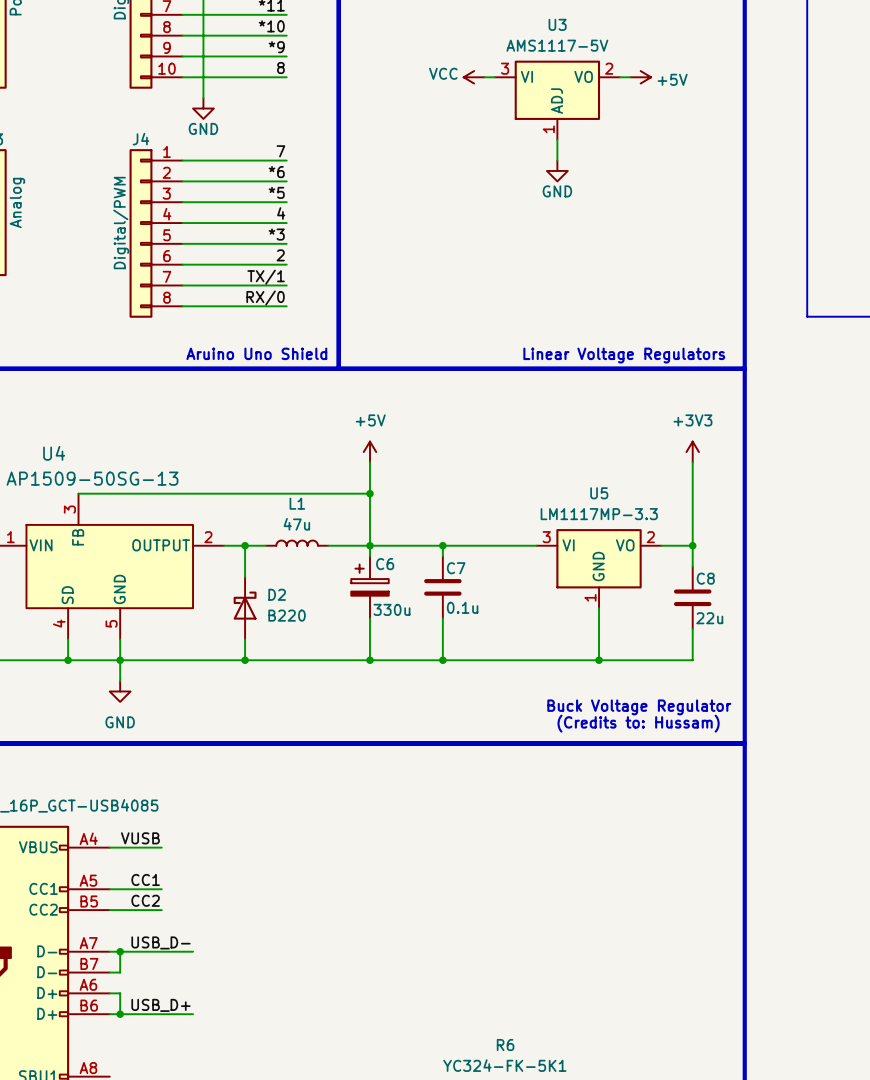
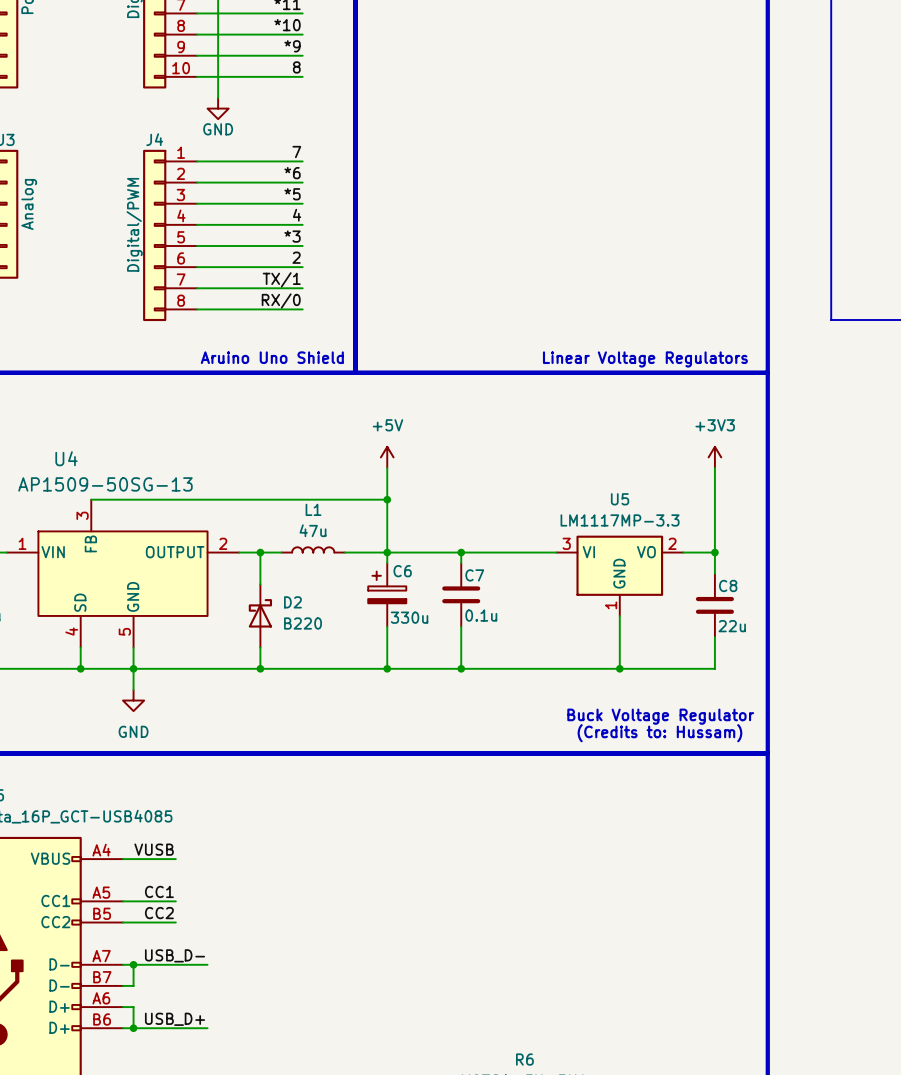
power symbol: VCC (474, 77) -> none
wire: (484, 77) (494, 77) -> none
wire: (619, 77) (630, 77) -> none
power symbol: +5V (640, 77) -> none
U3: AMS1117-5V (557, 100) -> none
wire: (557, 139) (557, 160) -> none
power symbol: GND (557, 170) -> none

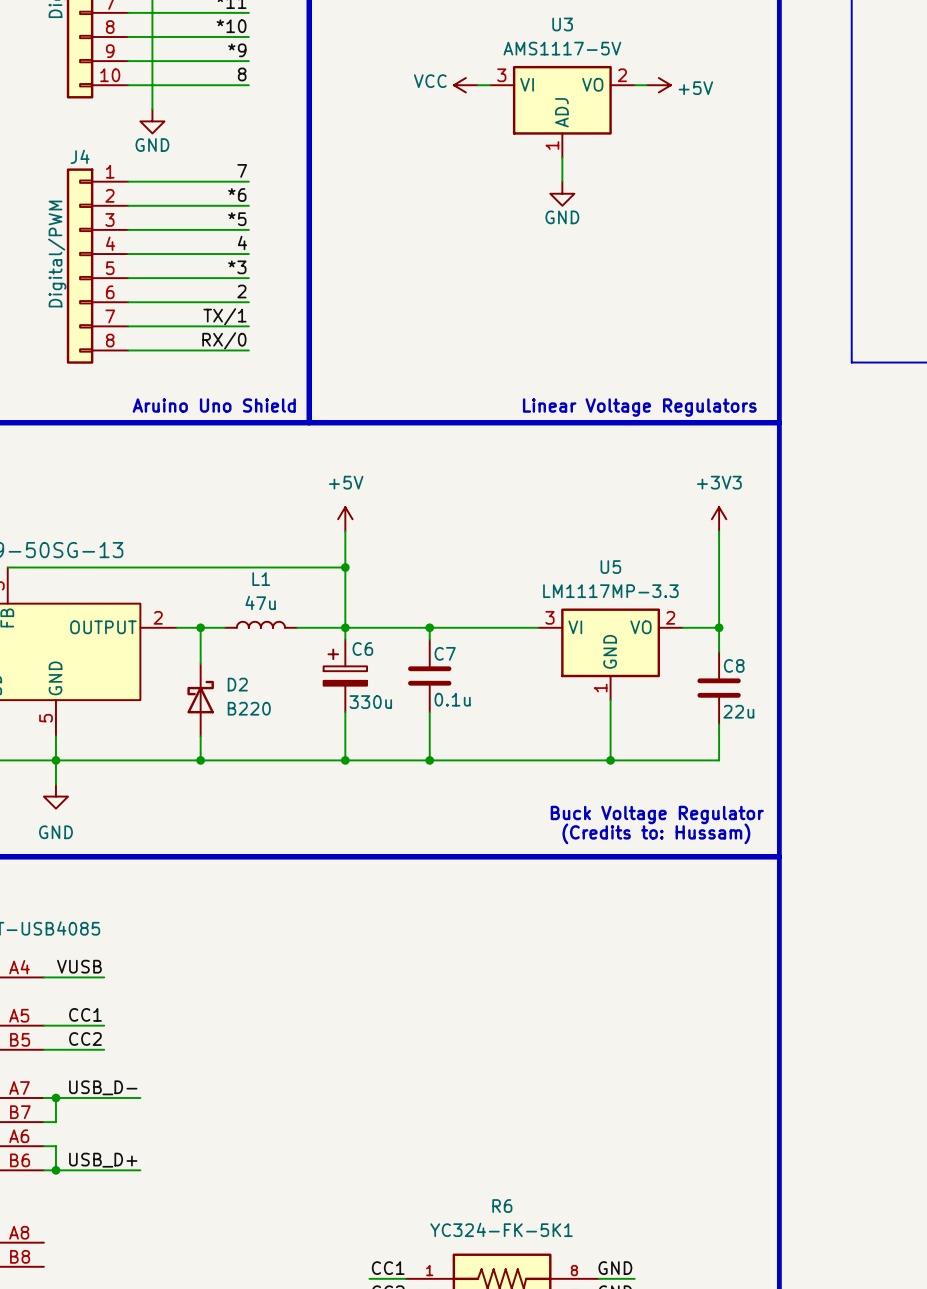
power symbol: none -> VCC (465, 85)
wire: none -> (477, 85) (490, 85)
wire: none -> (634, 85) (646, 85)
power symbol: none -> +5V (658, 85)
U3: none -> AMS1117-5V (562, 111)
wire: none -> (562, 157) (562, 181)
power symbol: none -> GND (562, 193)

